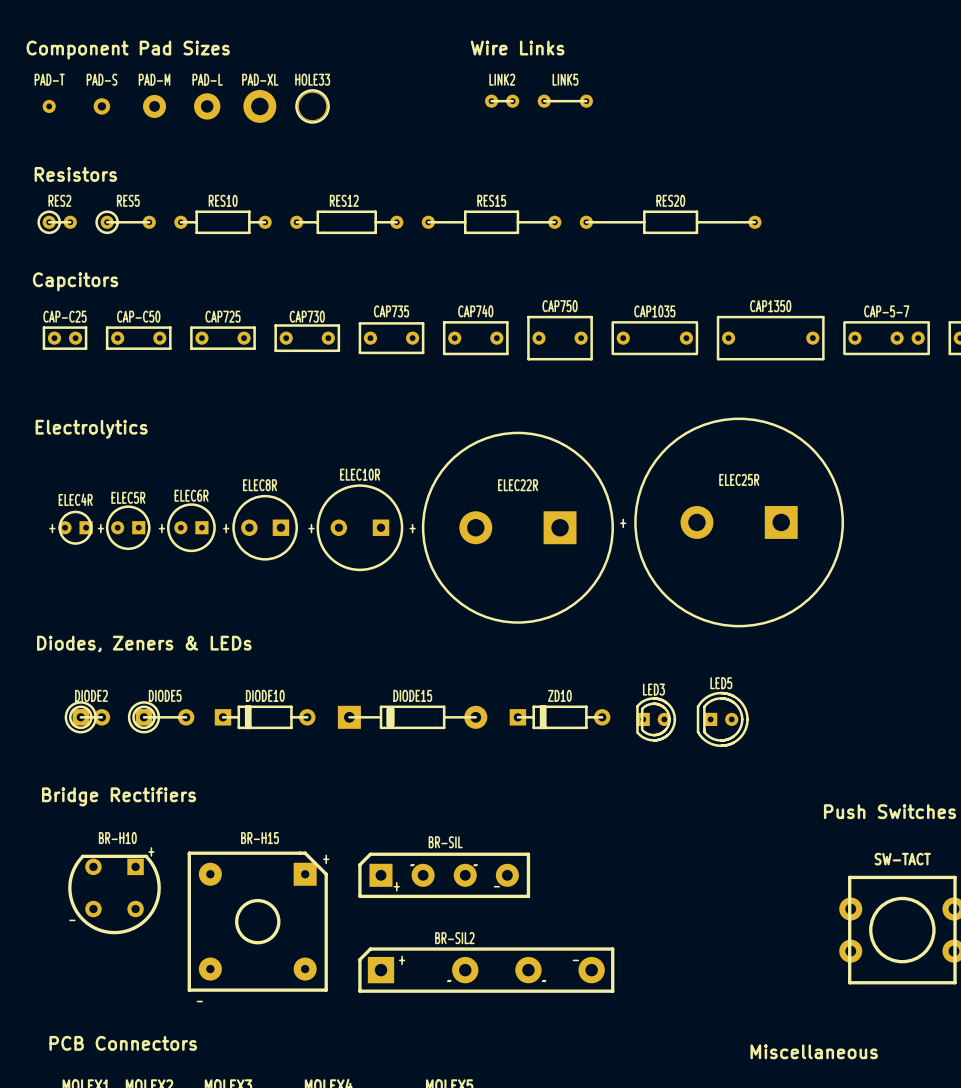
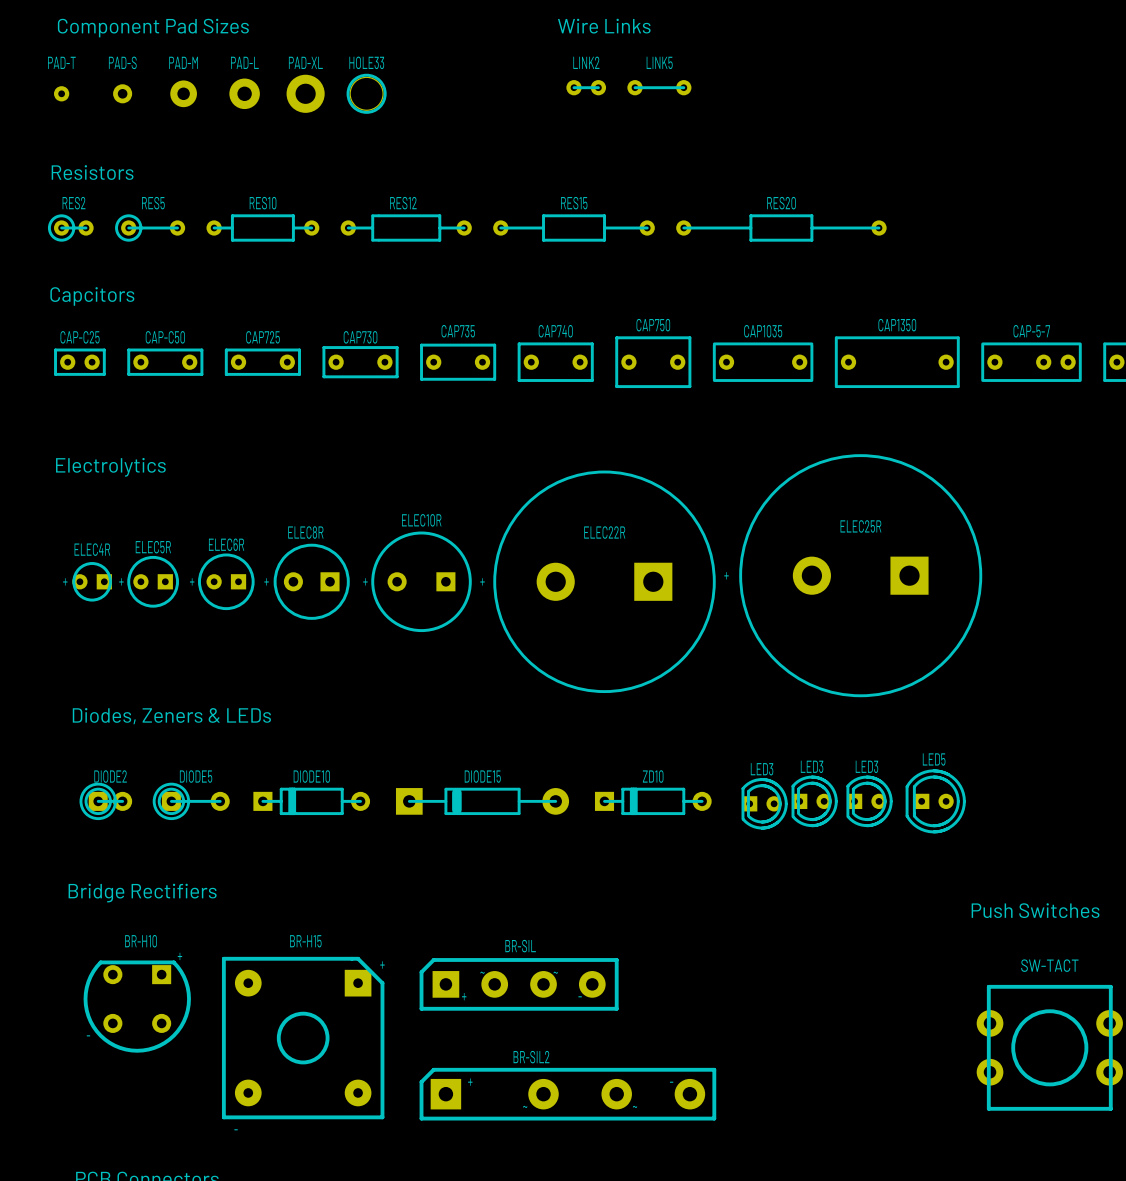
LED3: none -> (814, 801)
LED3: none -> (869, 801)
LED5 position: (722, 719) -> (935, 801)

